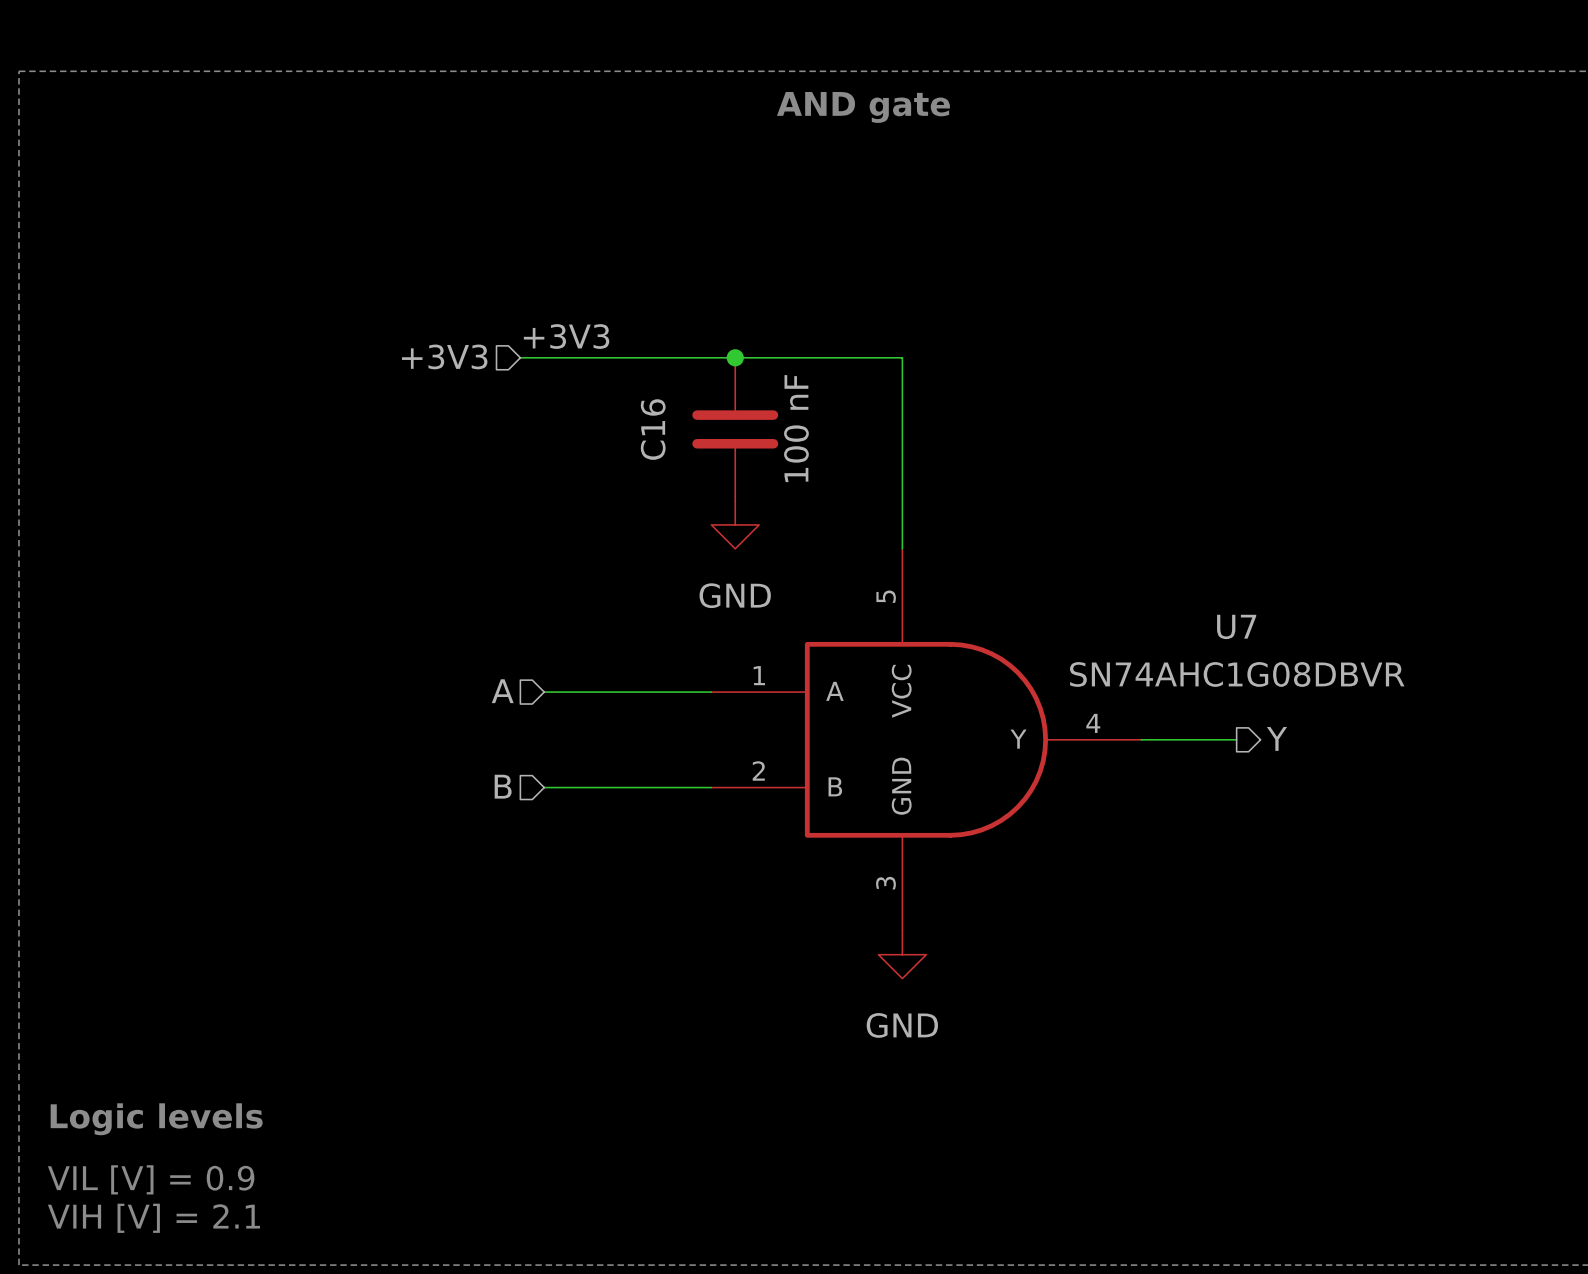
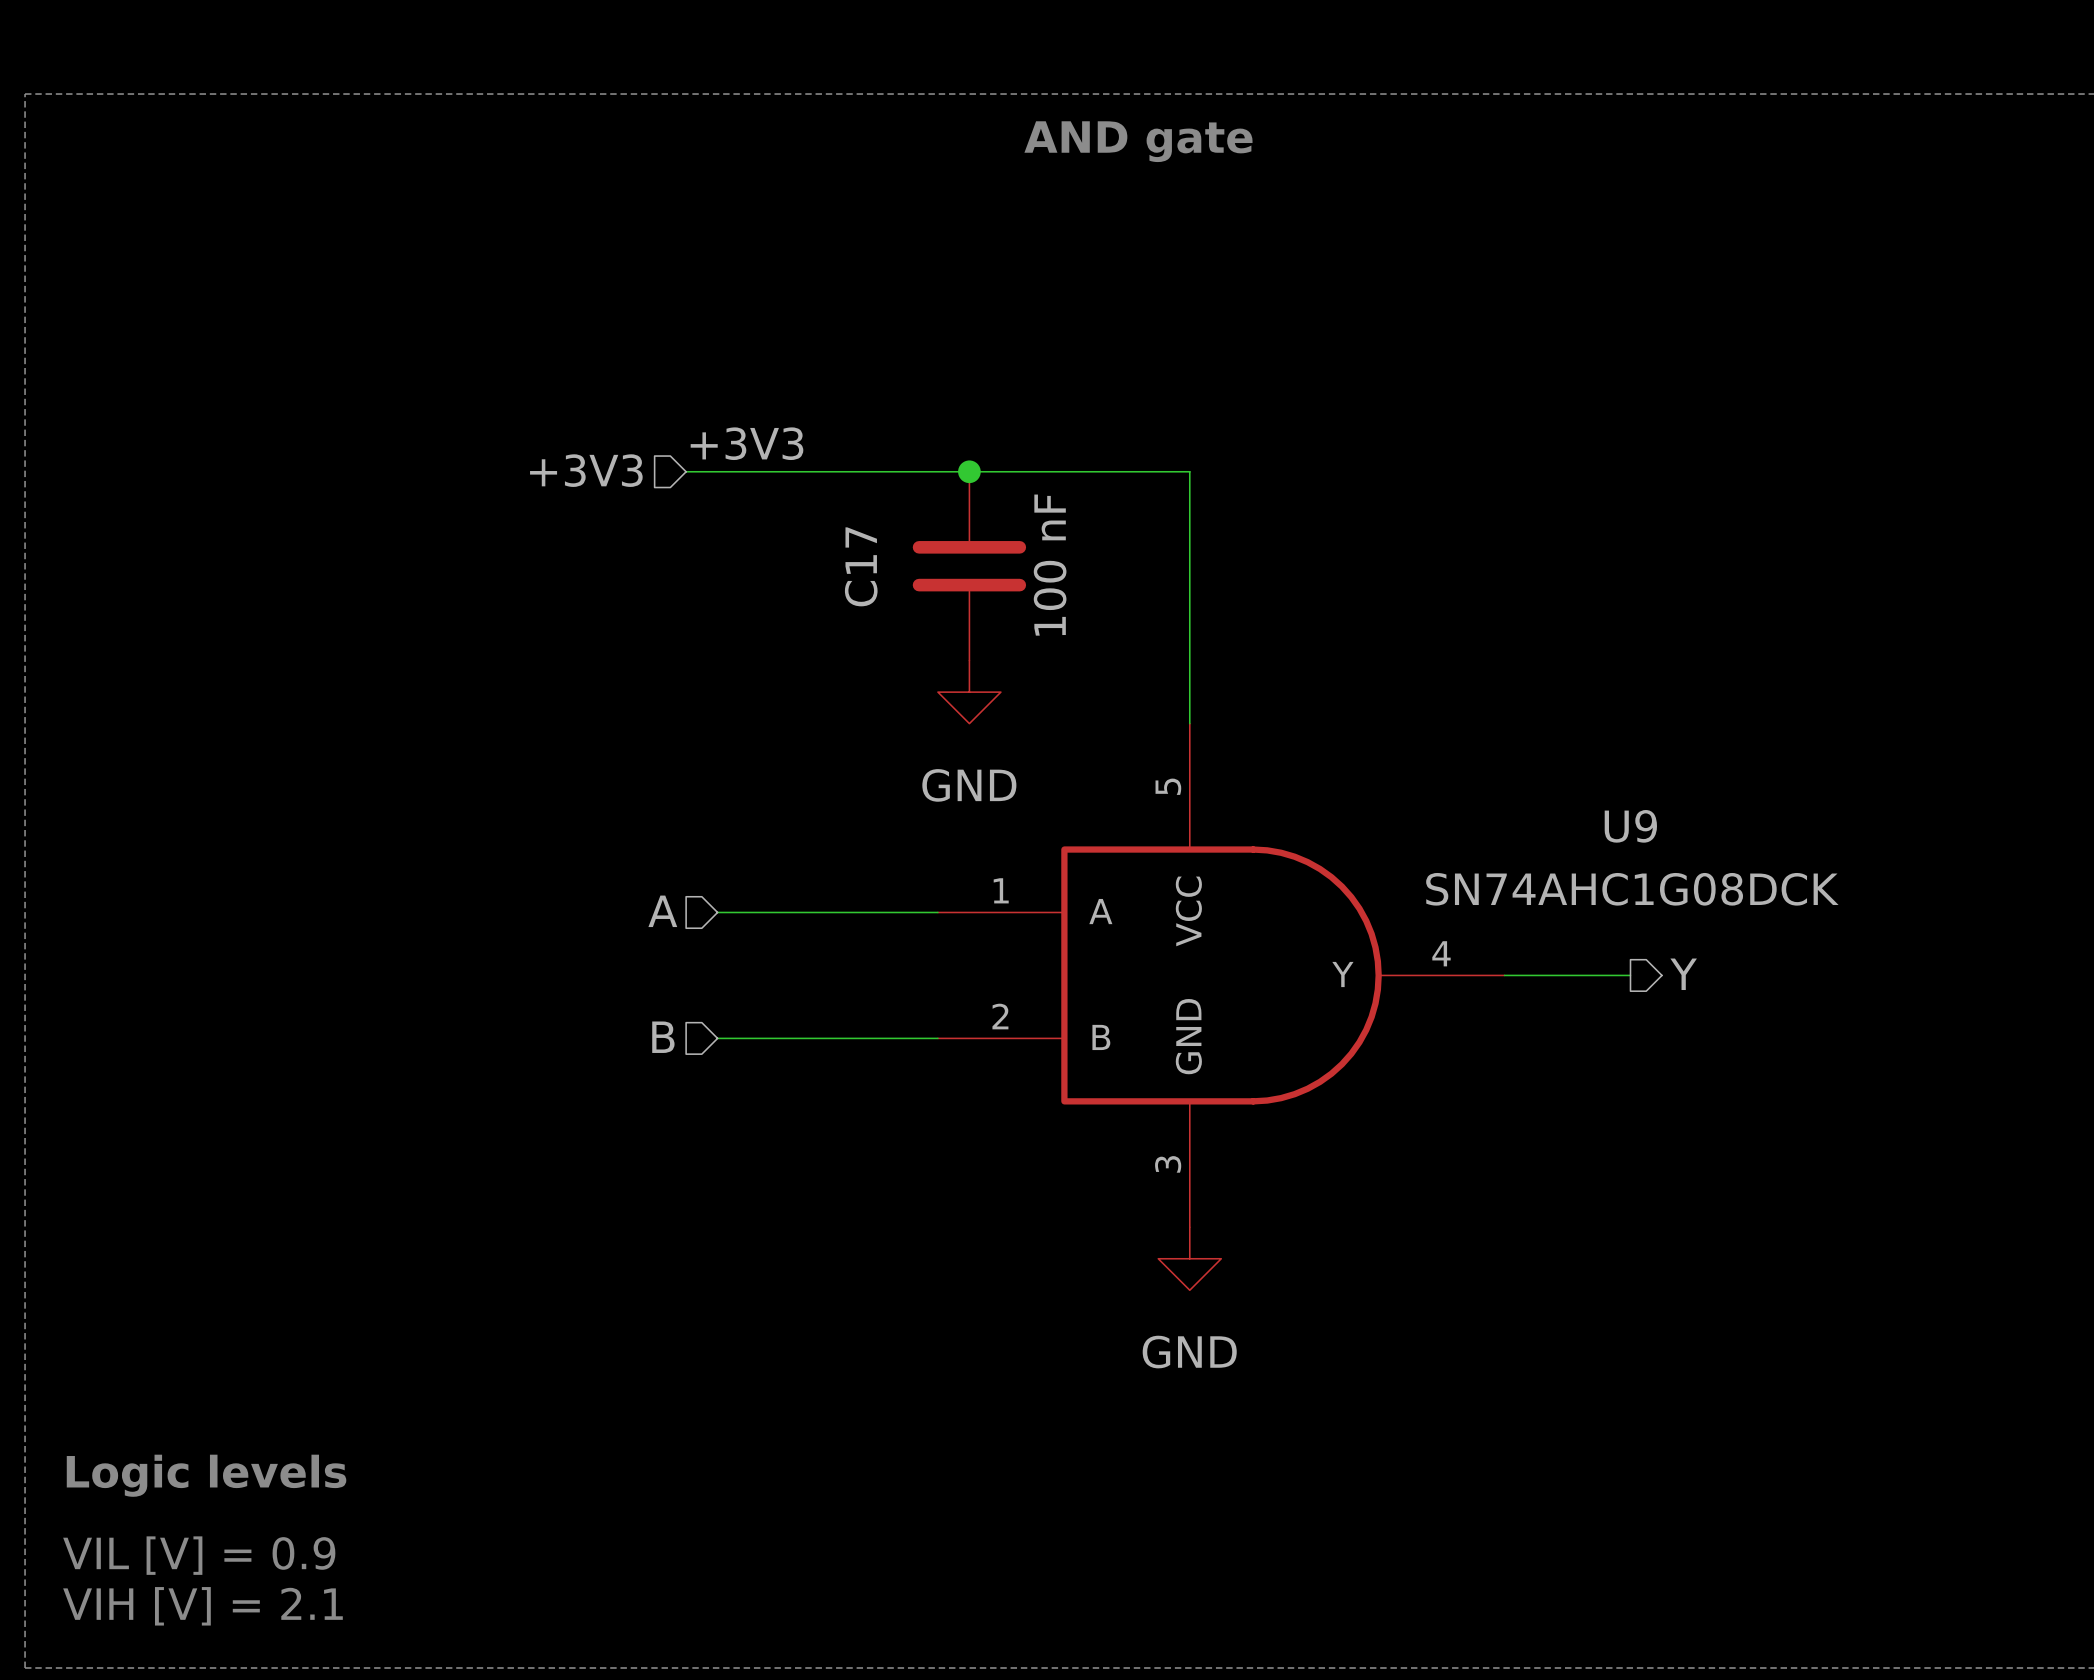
C16 name: C16 (653, 429) -> C17 (861, 566)
U7 name: U7 (1236, 626) -> U9 (1630, 826)
U7 value: SN74AHC1G08DBVR (1237, 674) -> SN74AHC1G08DCK (1632, 889)

